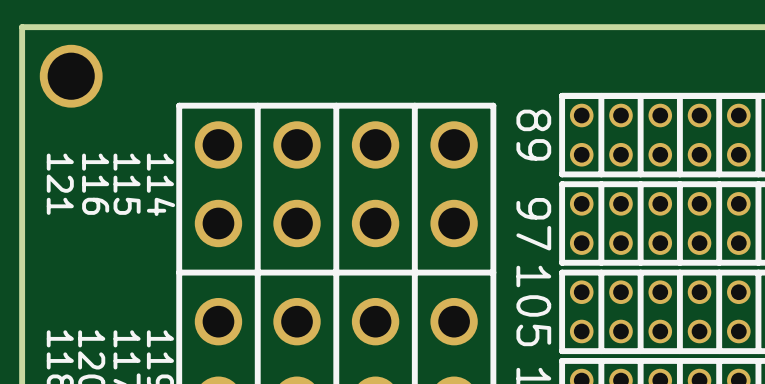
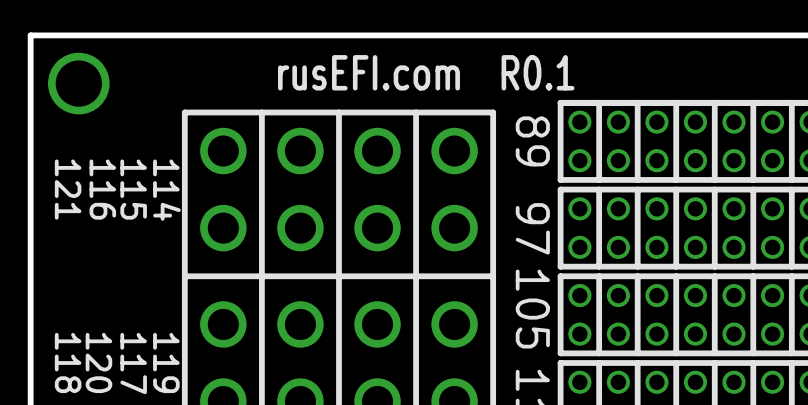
text: none -> rusEFI.com R0.1 (426, 72)

